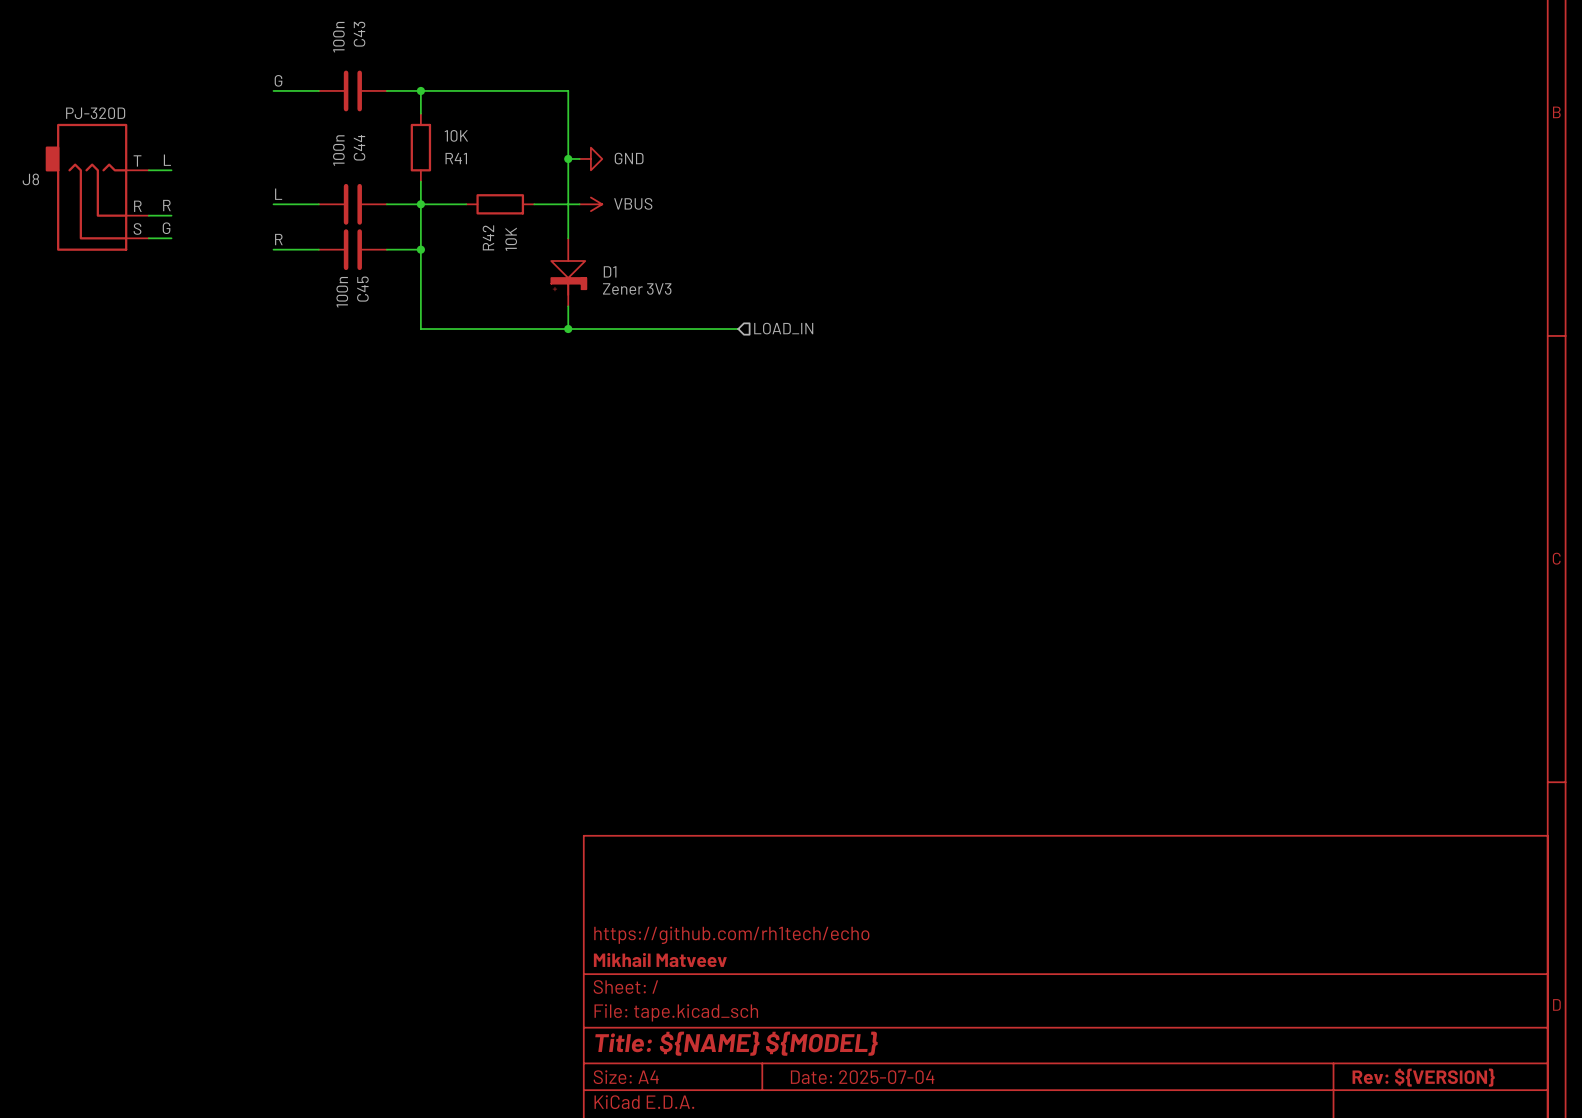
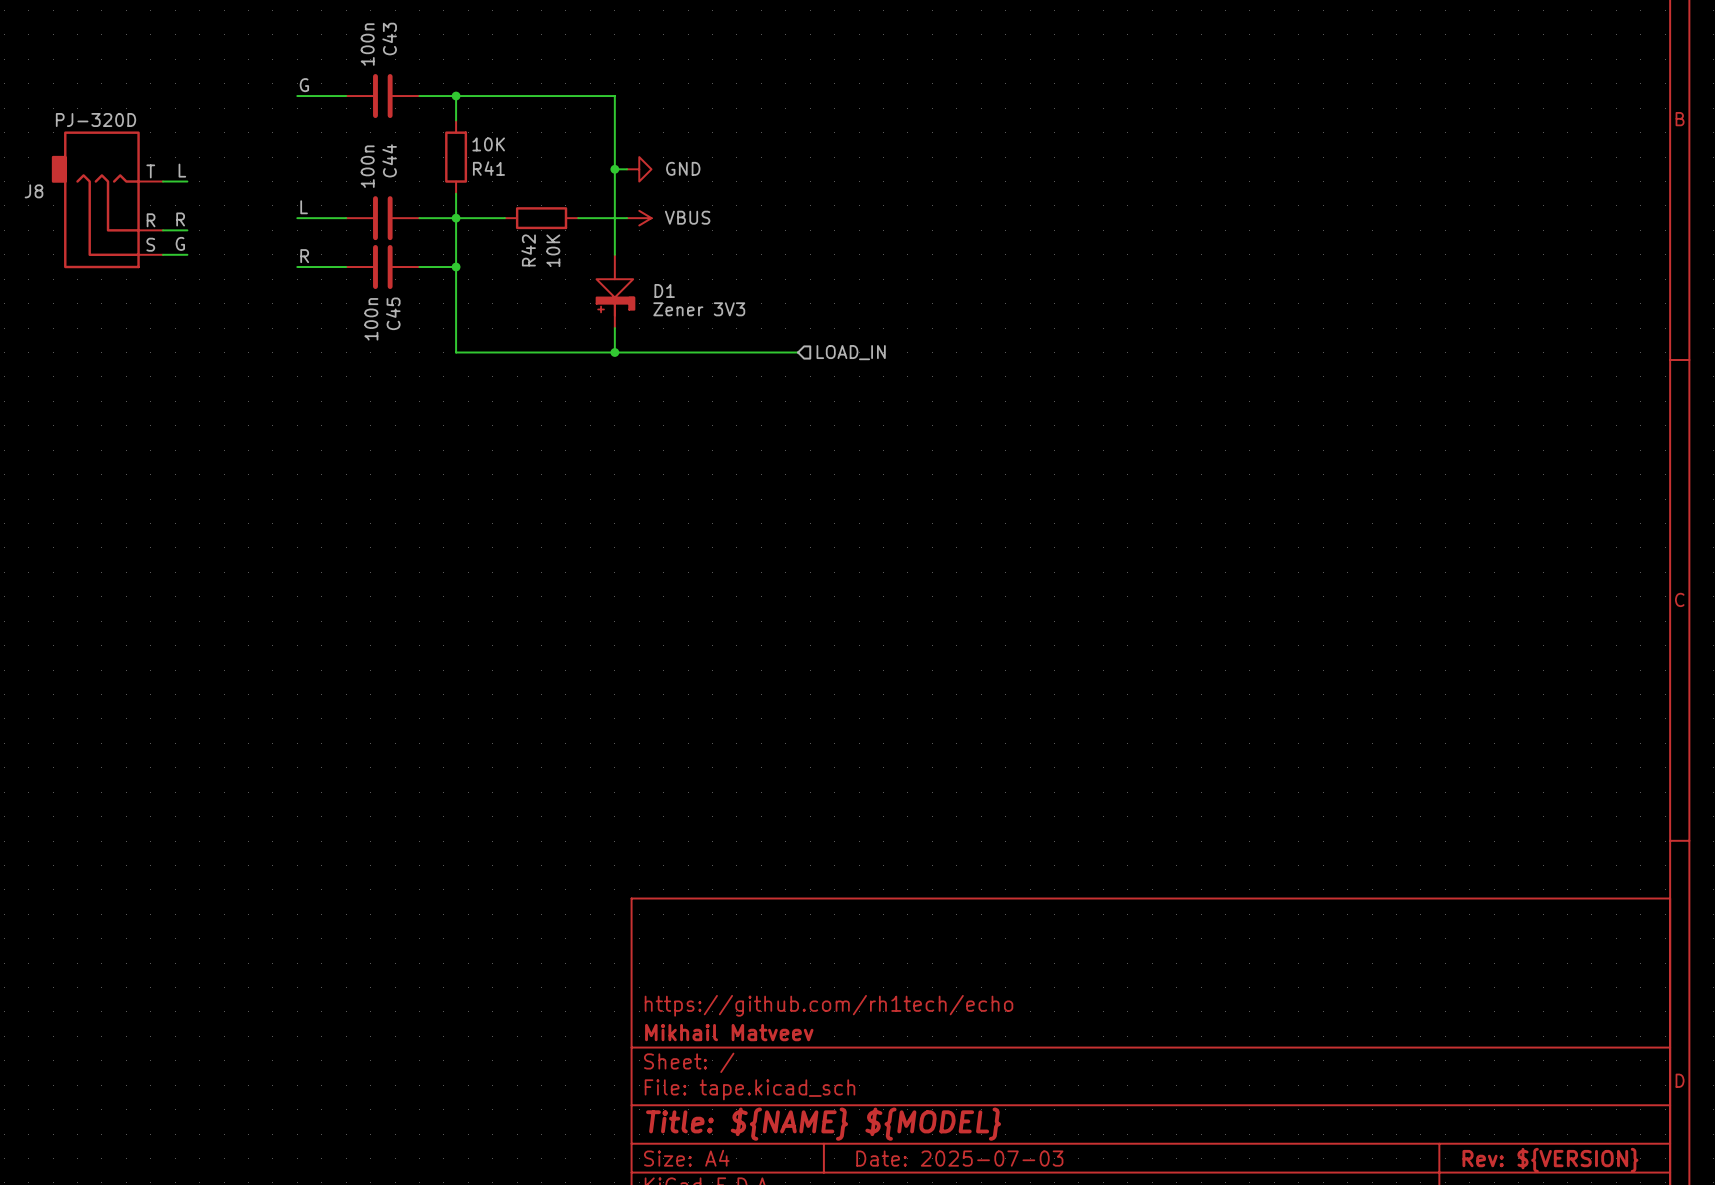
title block: Date: 2025-07-04 (862, 1077) -> Date: 2025-07-03 (959, 1158)

